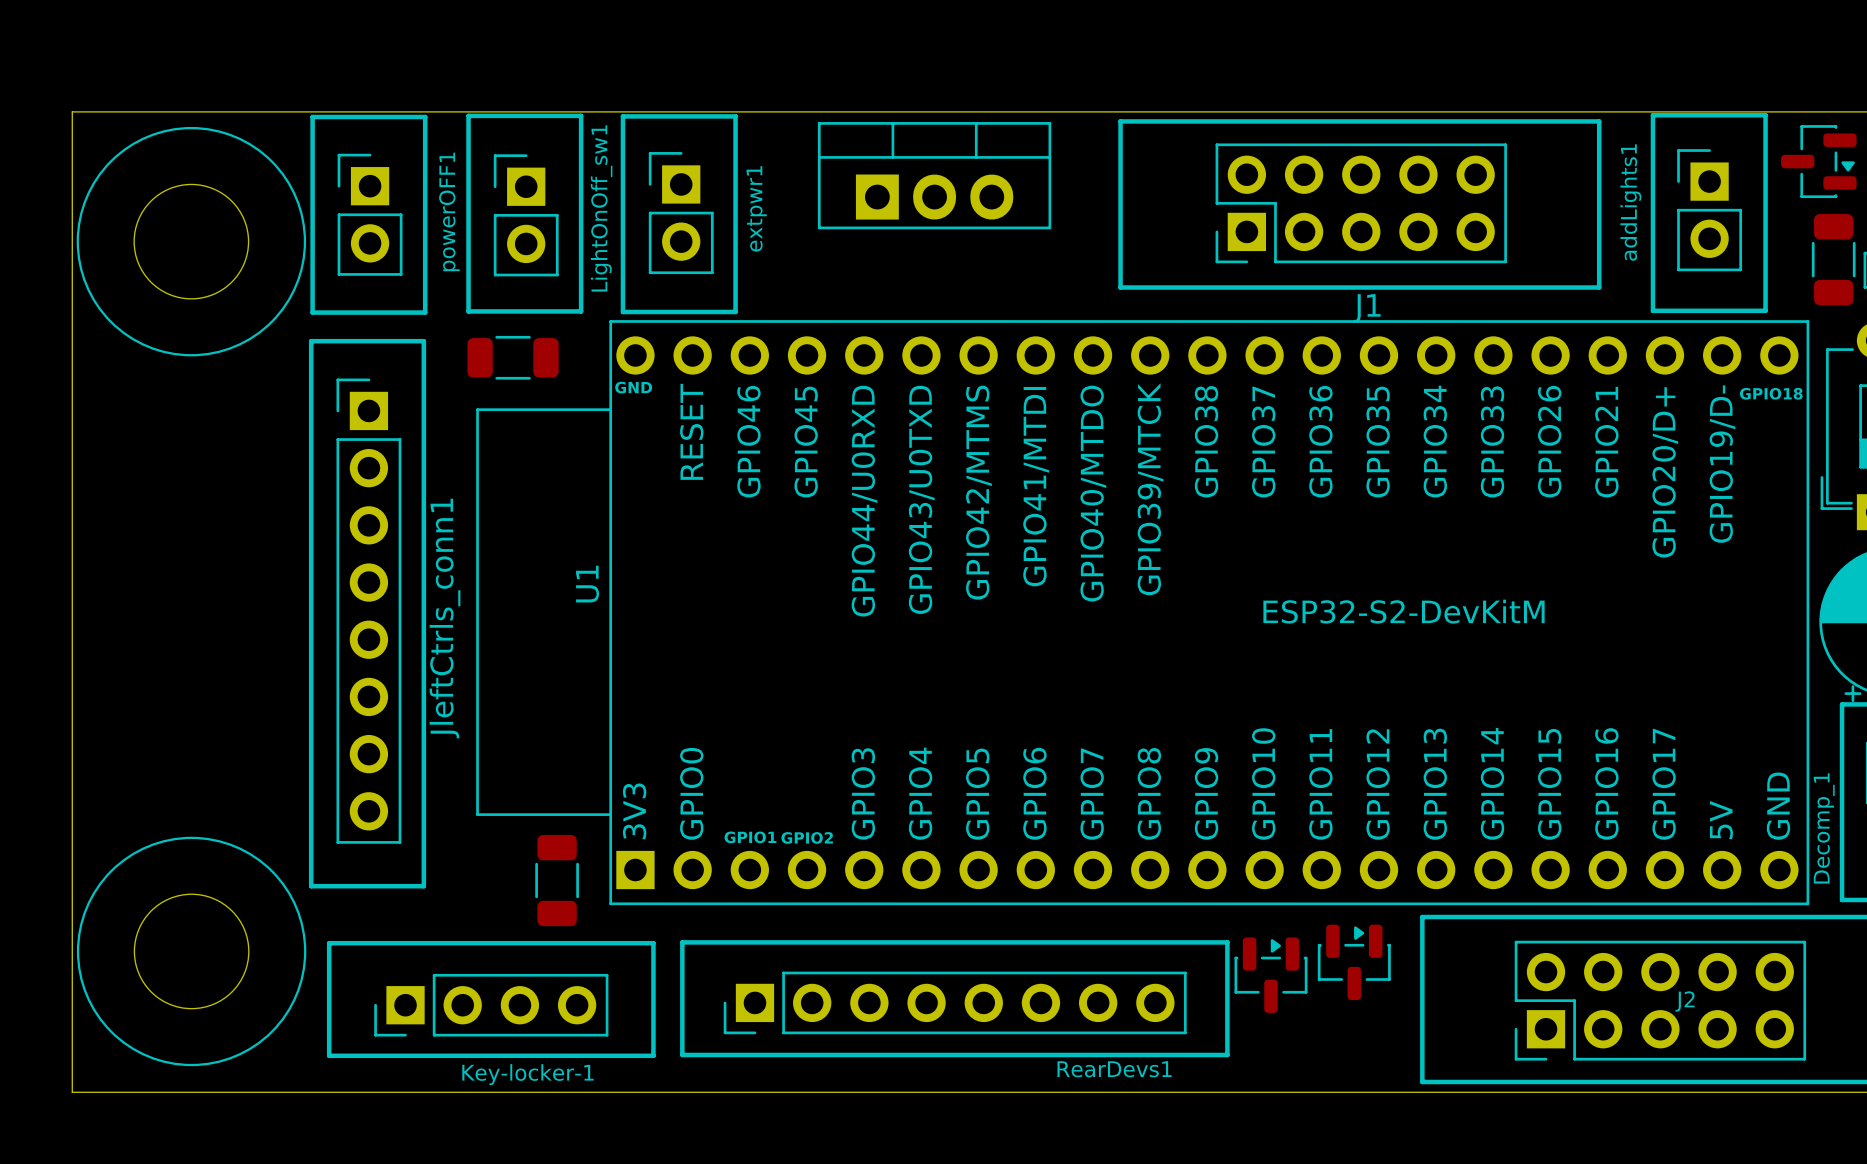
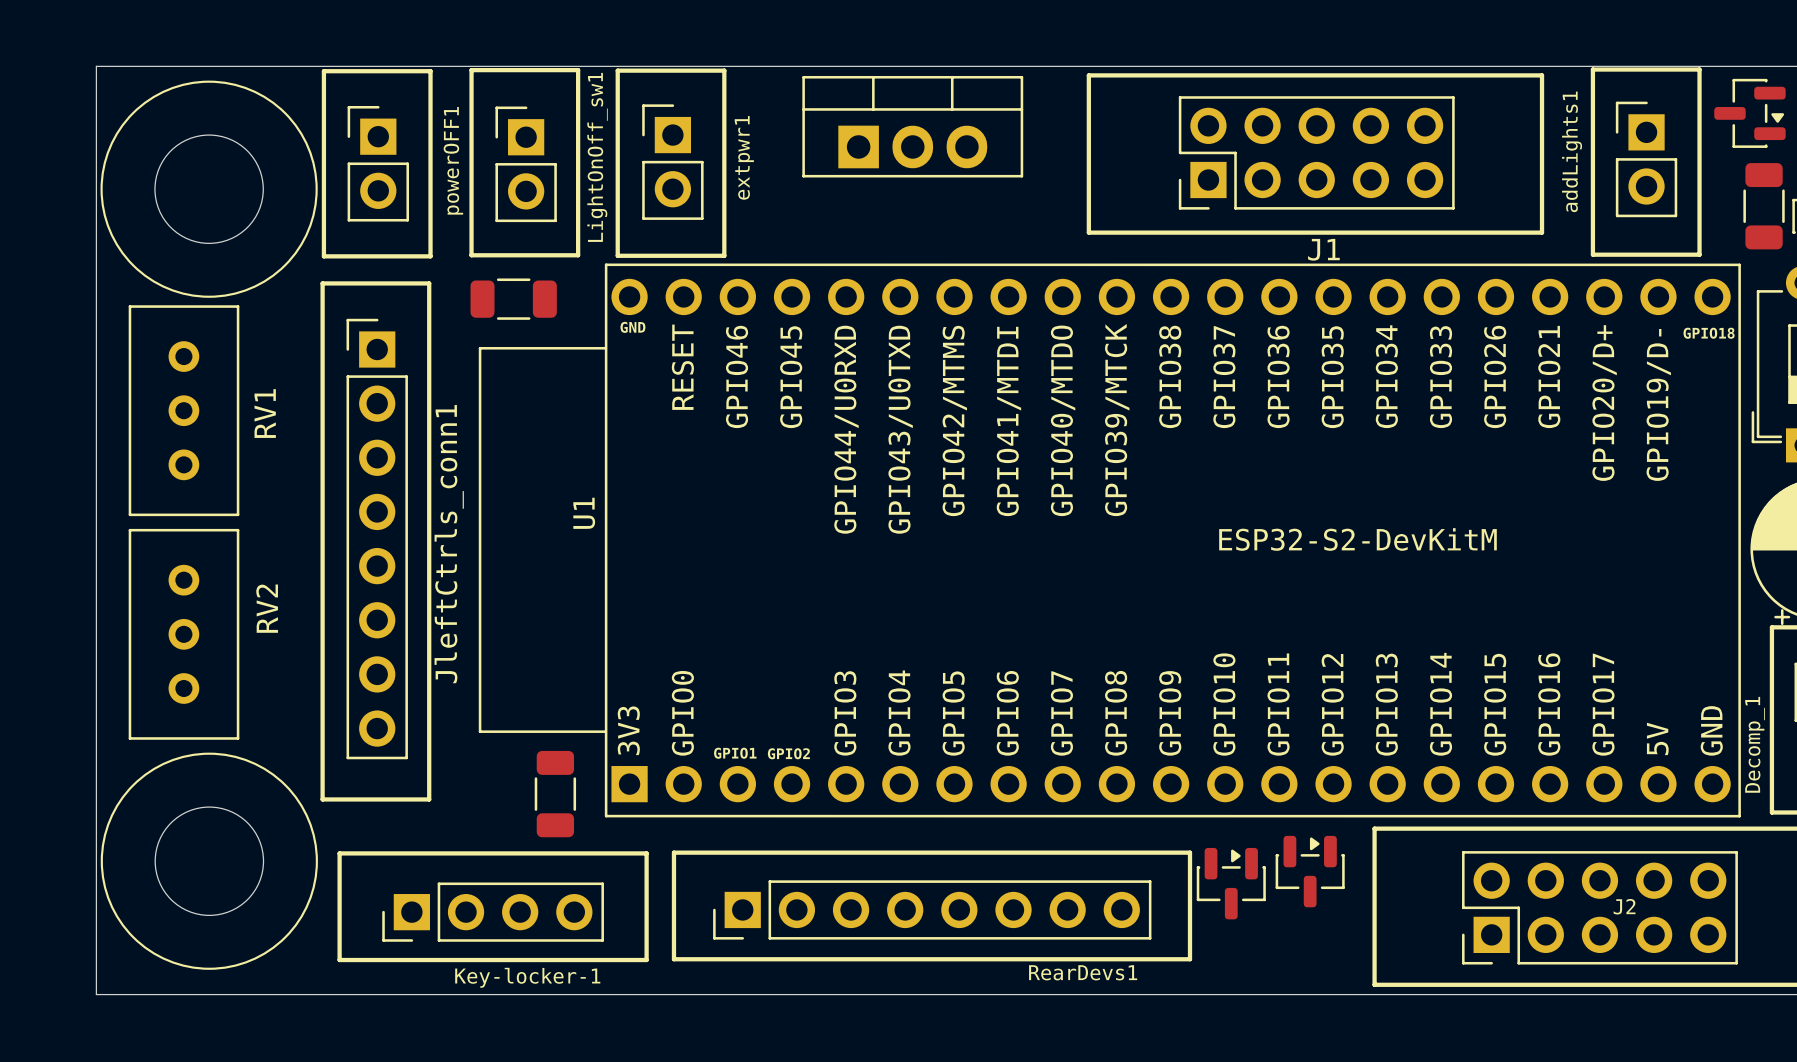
RV1: none -> (184, 410)
RV2: none -> (184, 634)

